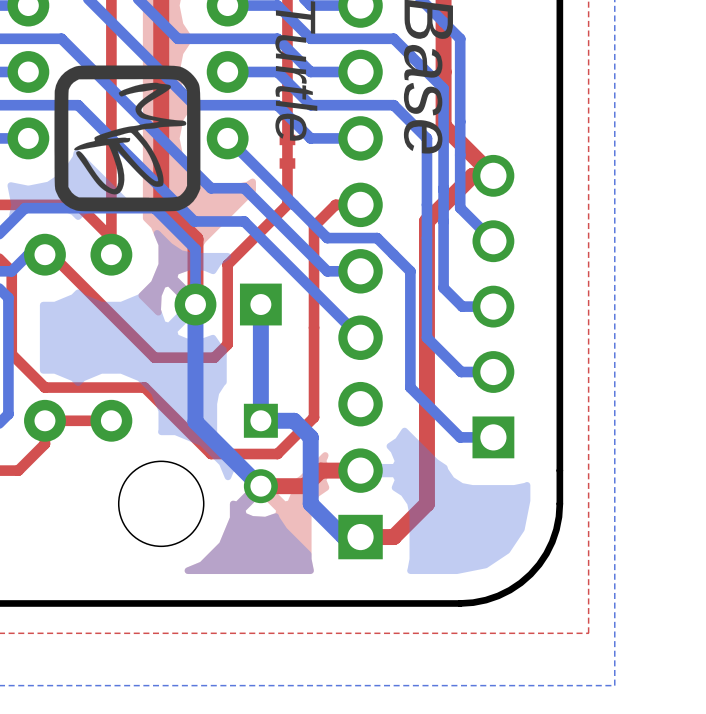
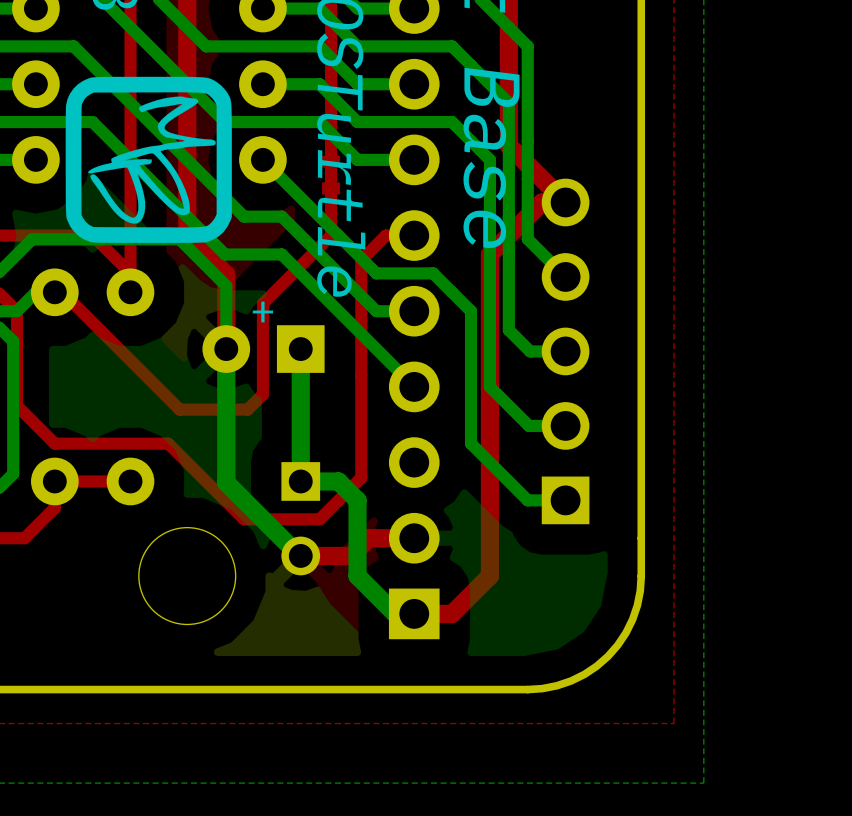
text: none -> + (262, 311)

